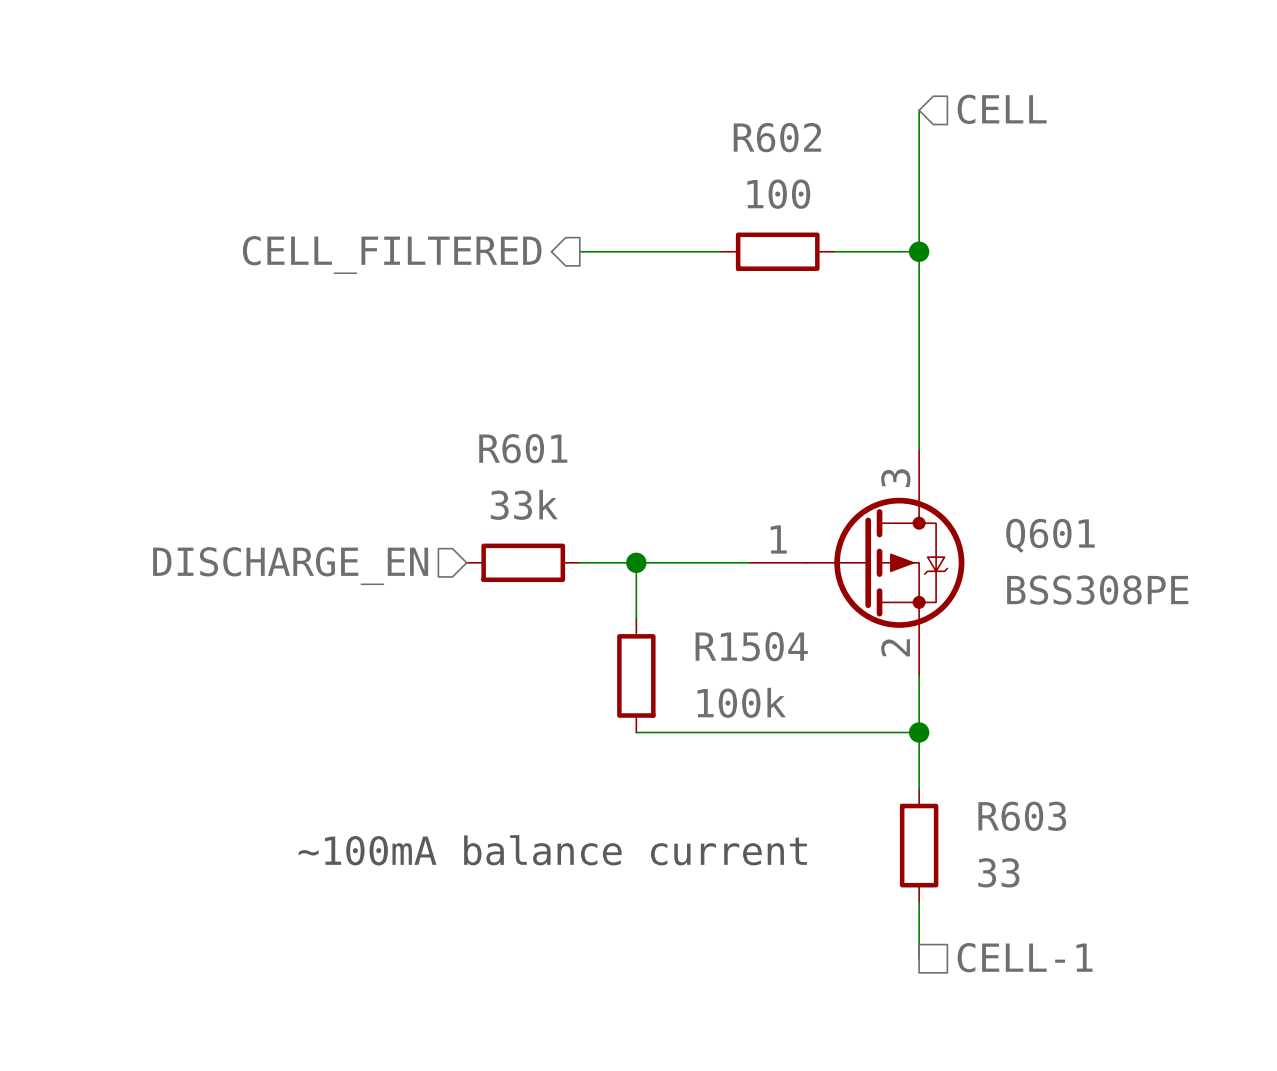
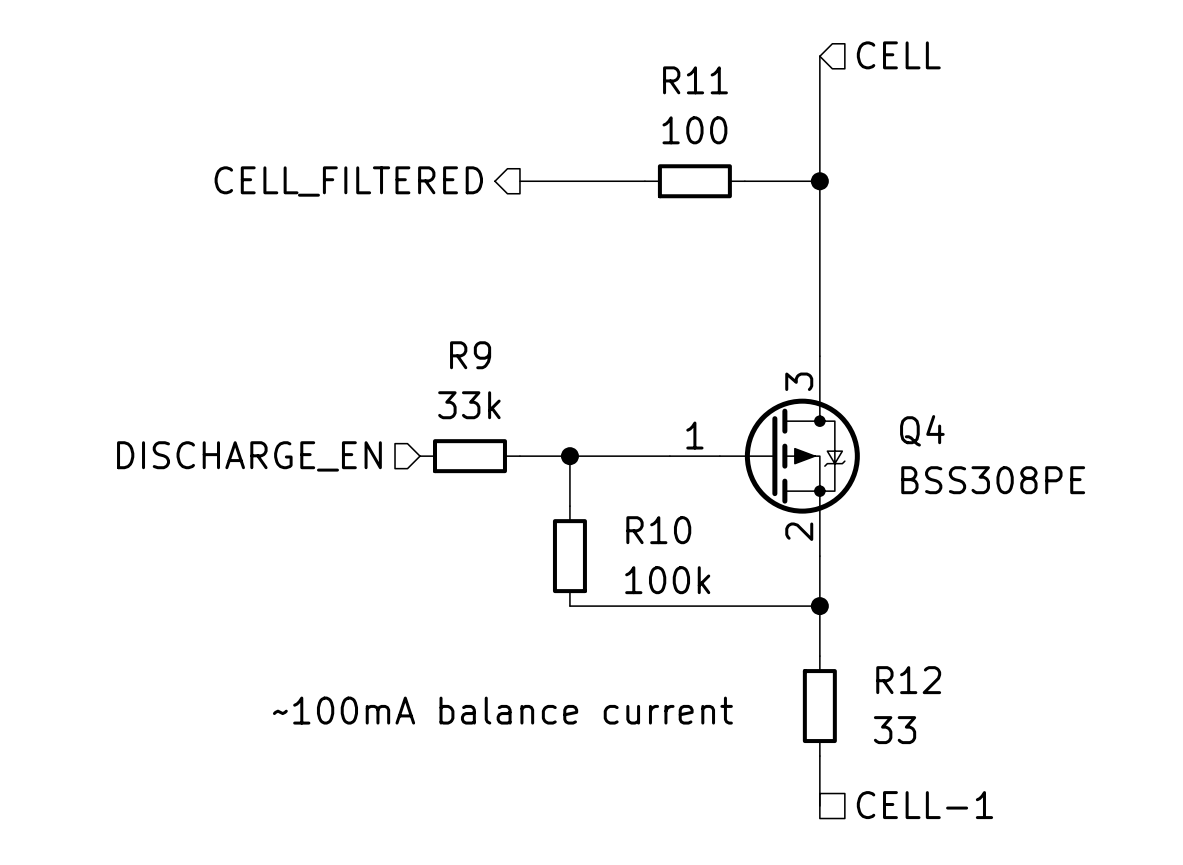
R602 name: R602 (777, 137) -> R11 (695, 80)
R601 name: R601 (523, 448) -> R9 (470, 355)
Q601 name: Q601 (1050, 535) -> Q4 (922, 430)
R1504 name: R1504 (751, 646) -> R10 (658, 530)
R603 name: R603 (1022, 816) -> R12 (908, 680)

